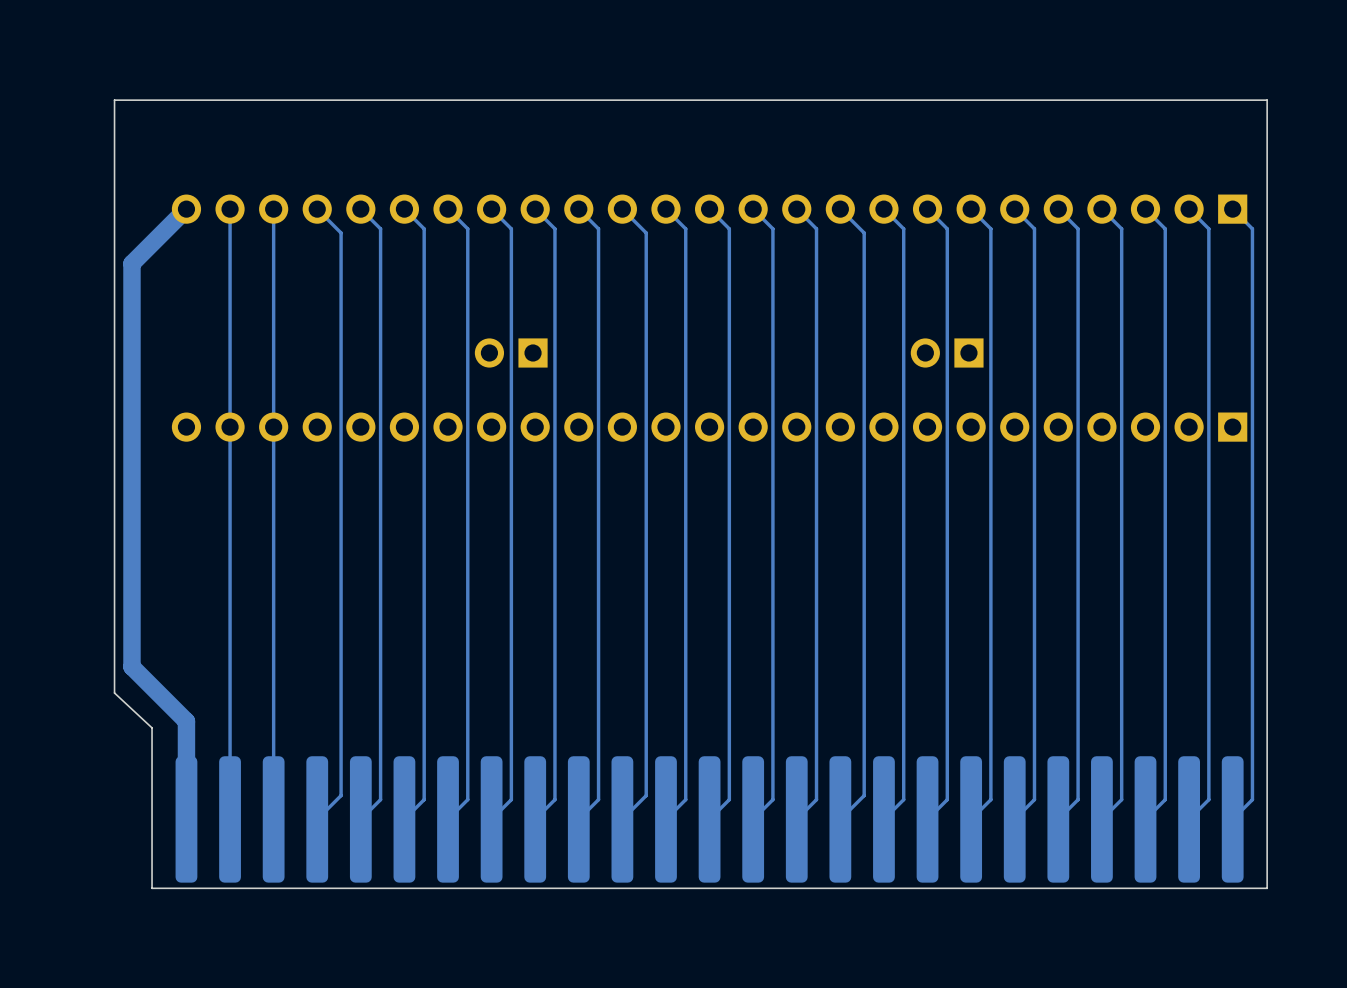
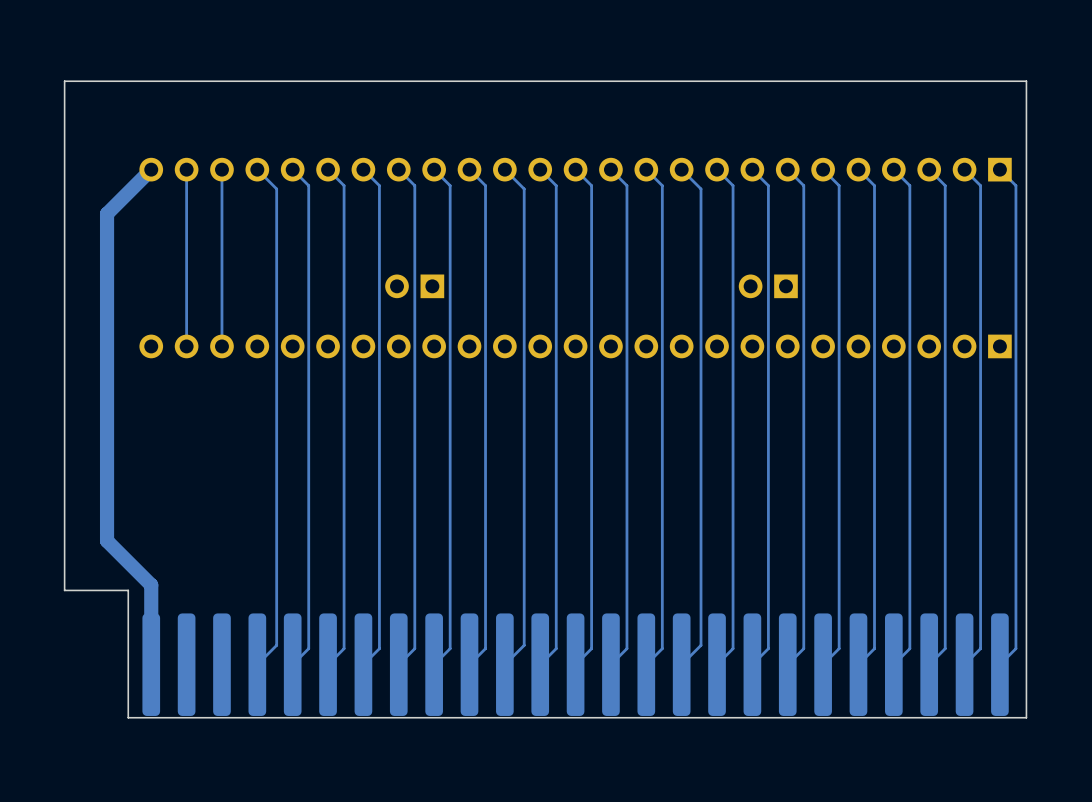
board edge: (1265, 100) (1267, 100) (1267, 888) (152, 888) (152, 727) (114, 693) (114, 100) -> (1026, 81) (1026, 717) (128, 717) (128, 590) (64, 590) (64, 81) (92, 81)
track: (230, 427) (230, 819) -> none
track: (273, 427) (273, 819) -> none

